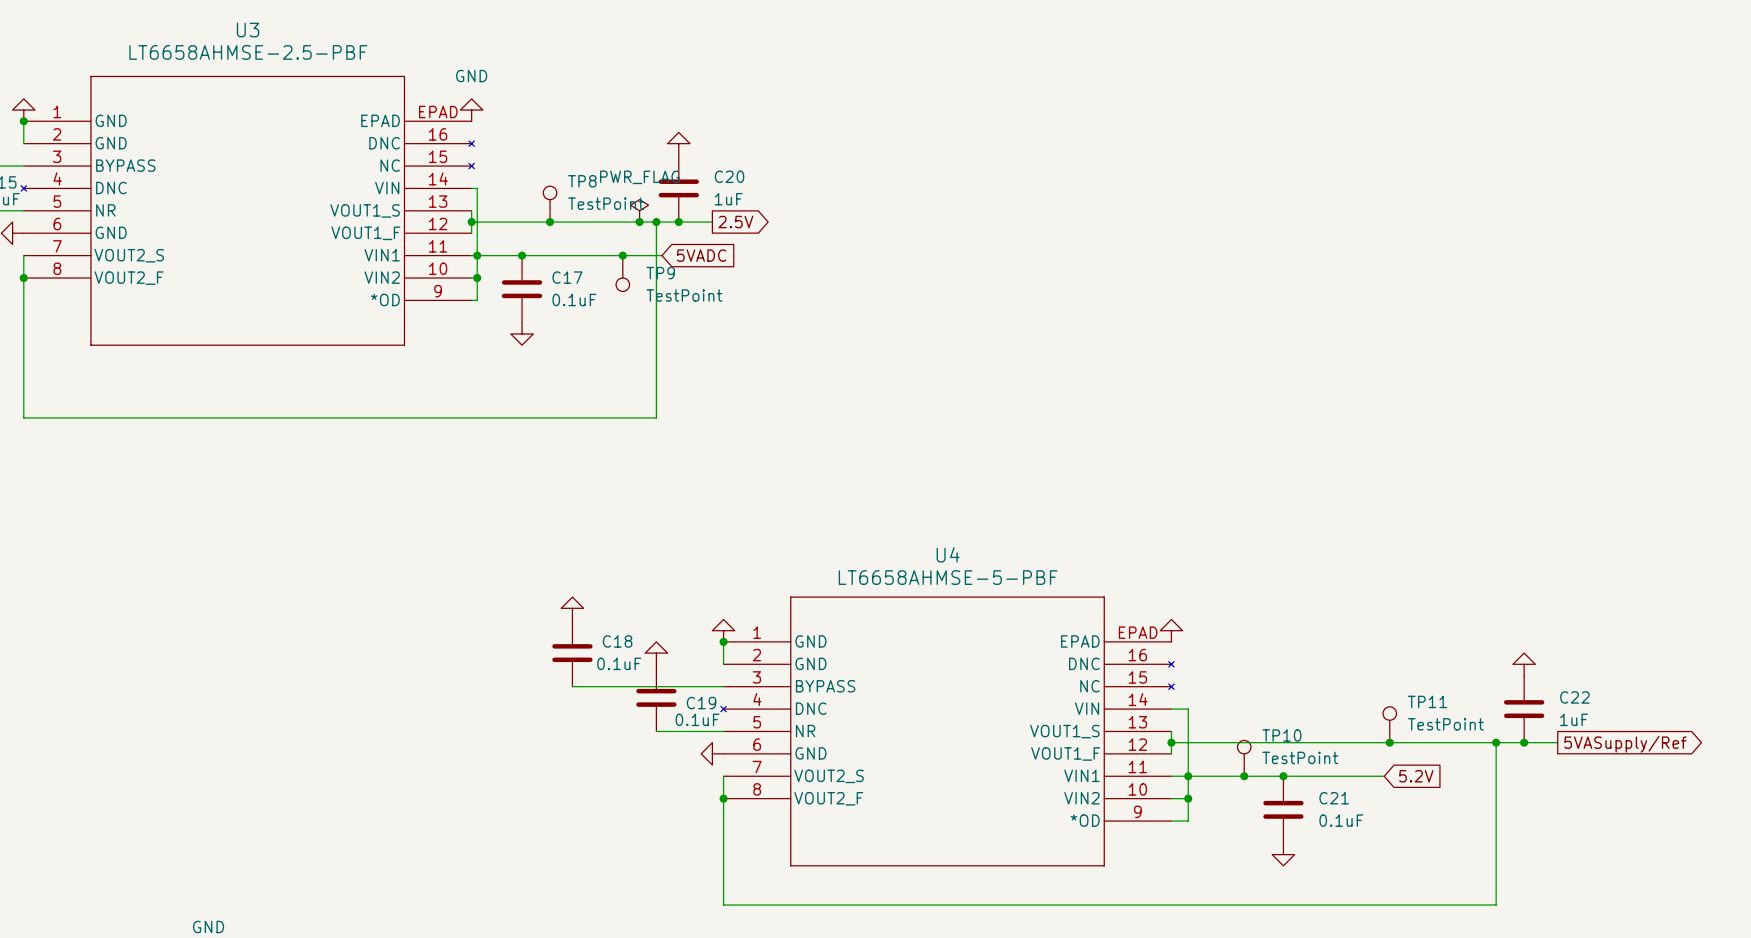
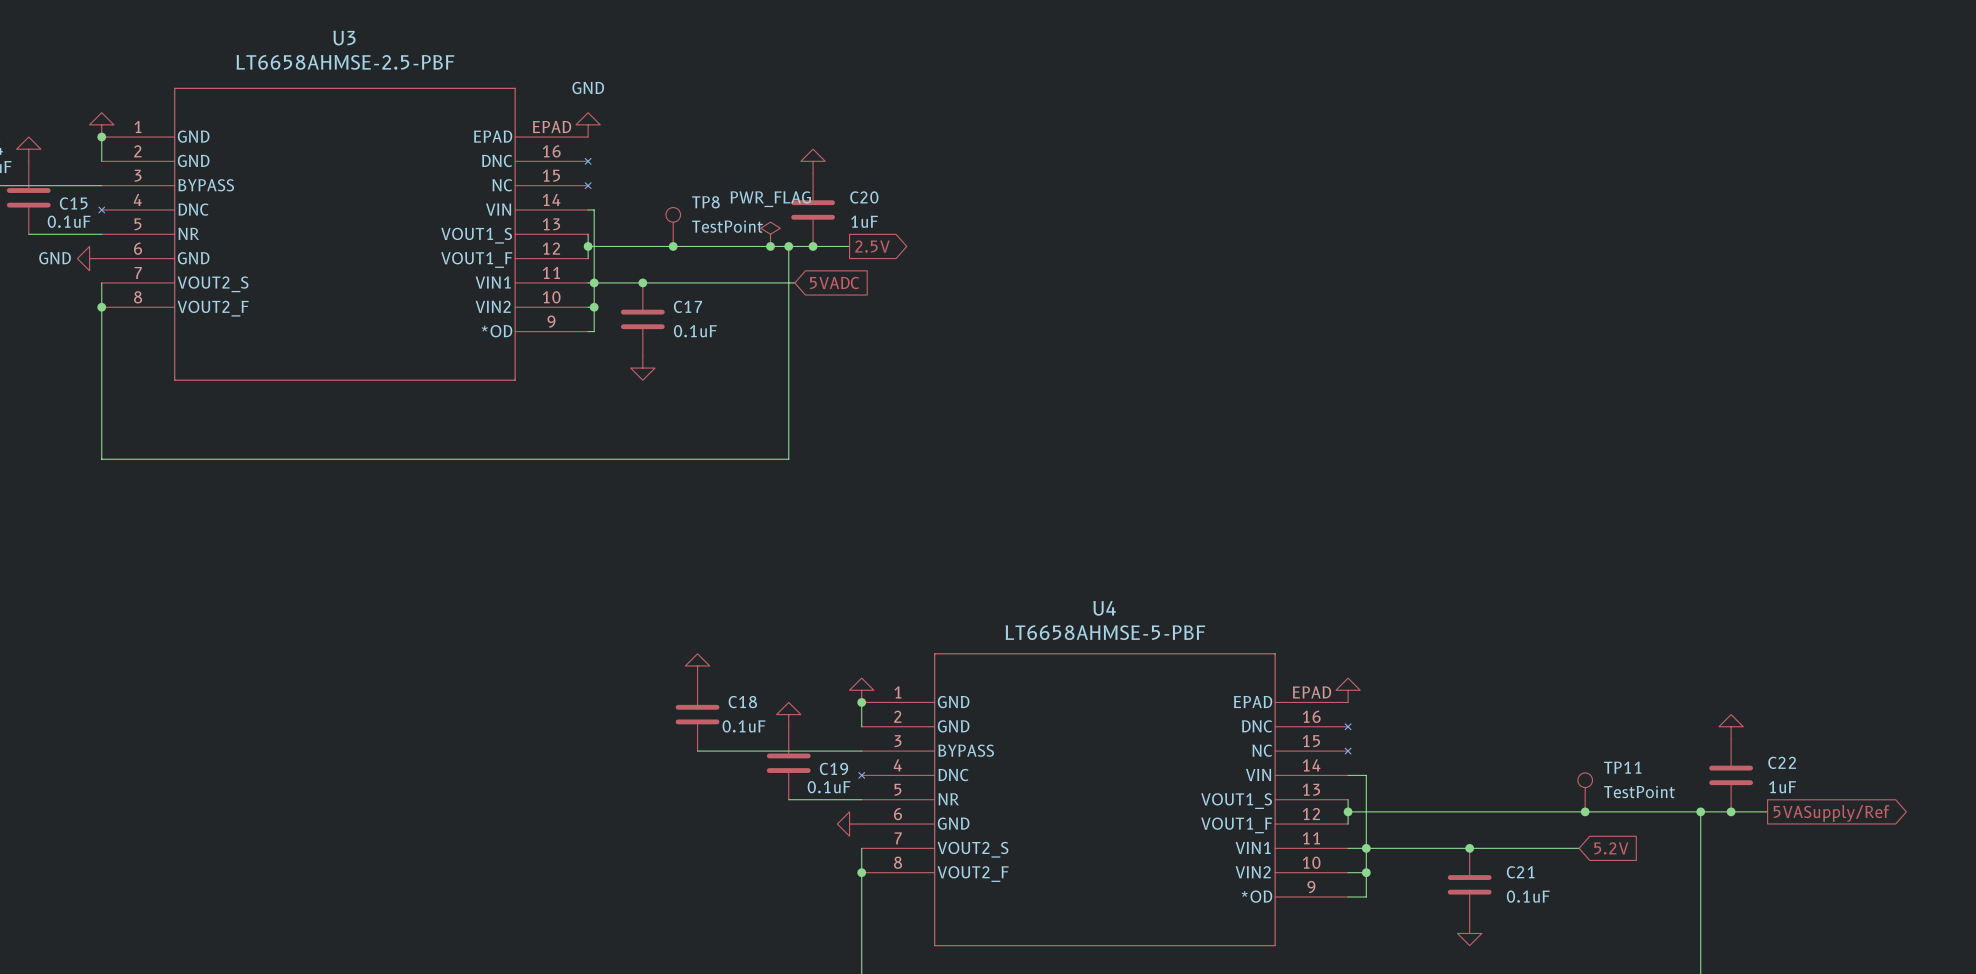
junction: (622, 255) -> none
TP9: TestPoint (622, 273) -> none
TP10: TestPoint (1244, 758) -> none
junction: (1244, 776) -> none

